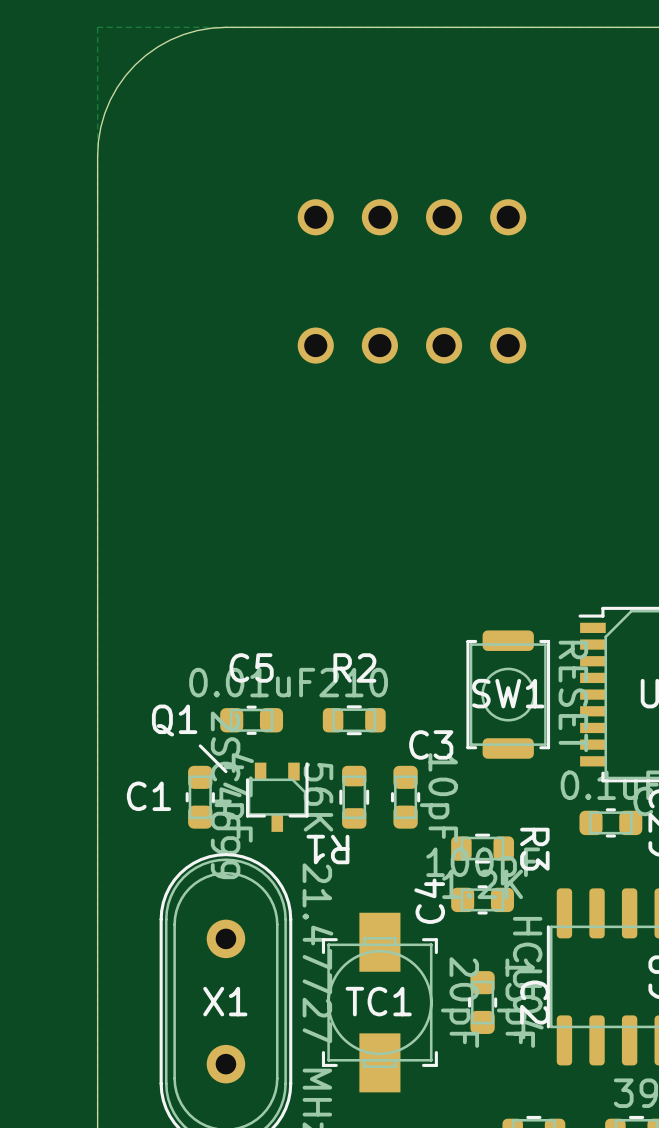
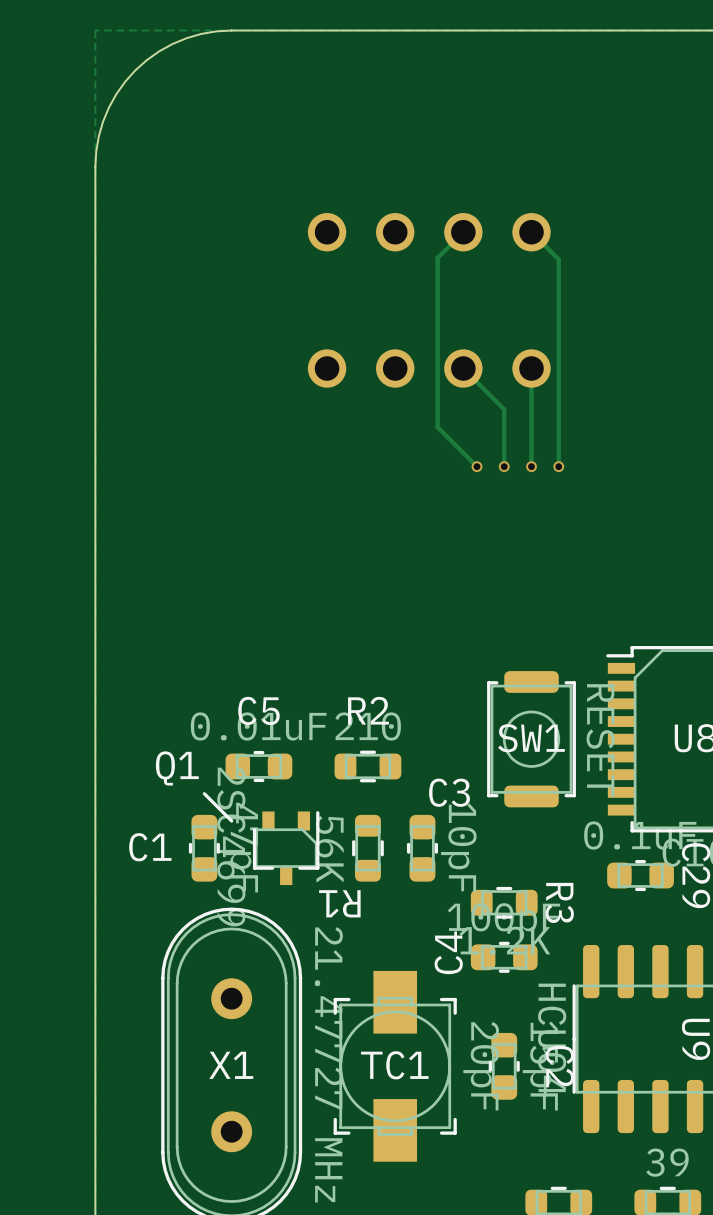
track: none -> (463, 232) (437, 257) (437, 427) (476, 466)
track: none -> (531, 232) (558, 259) (558, 466)
track: none -> (463, 368) (504, 409) (504, 466)
track: none -> (531, 368) (531, 466)
via: none -> (476, 466)
via: none -> (504, 466)
via: none -> (531, 466)
via: none -> (558, 466)

